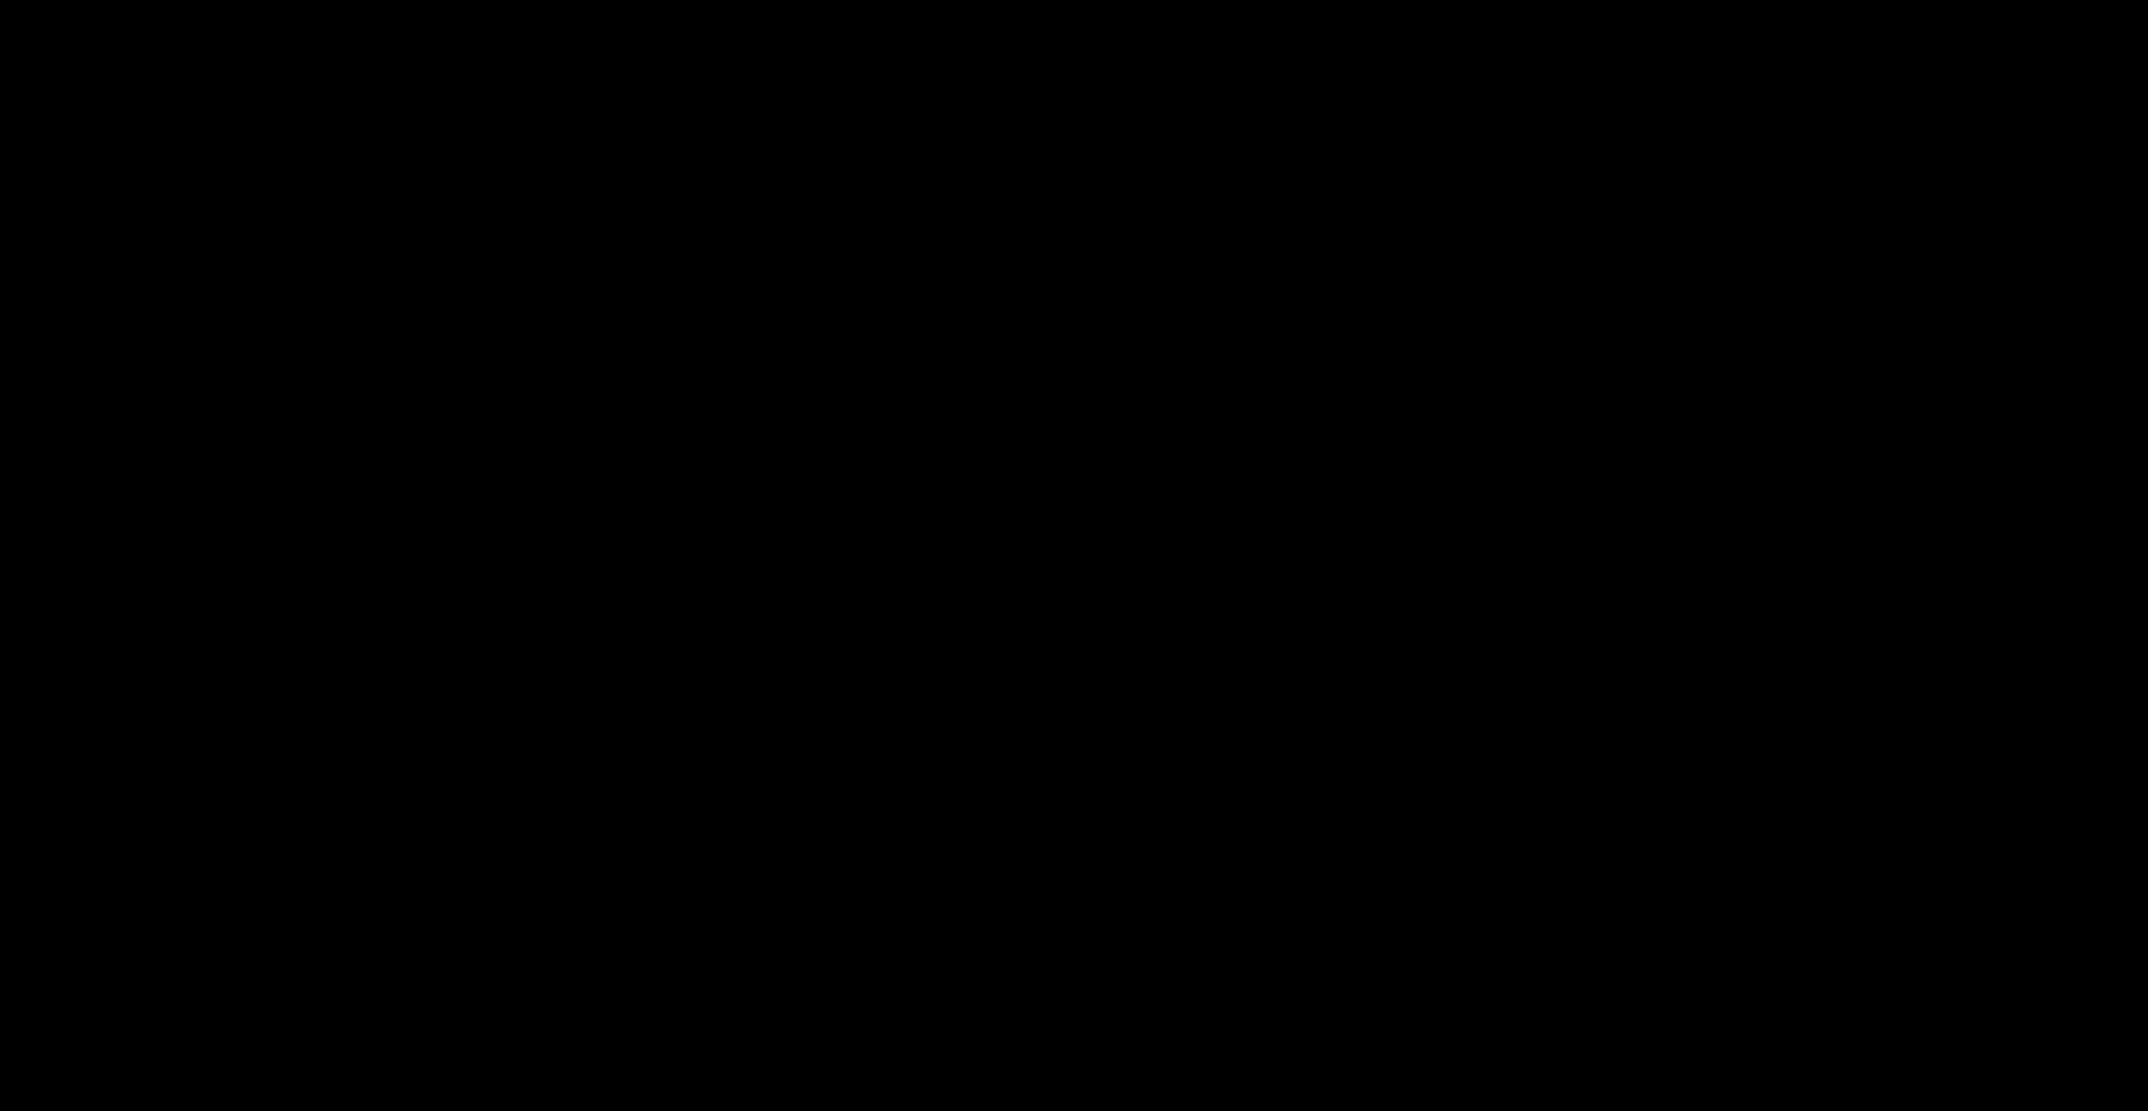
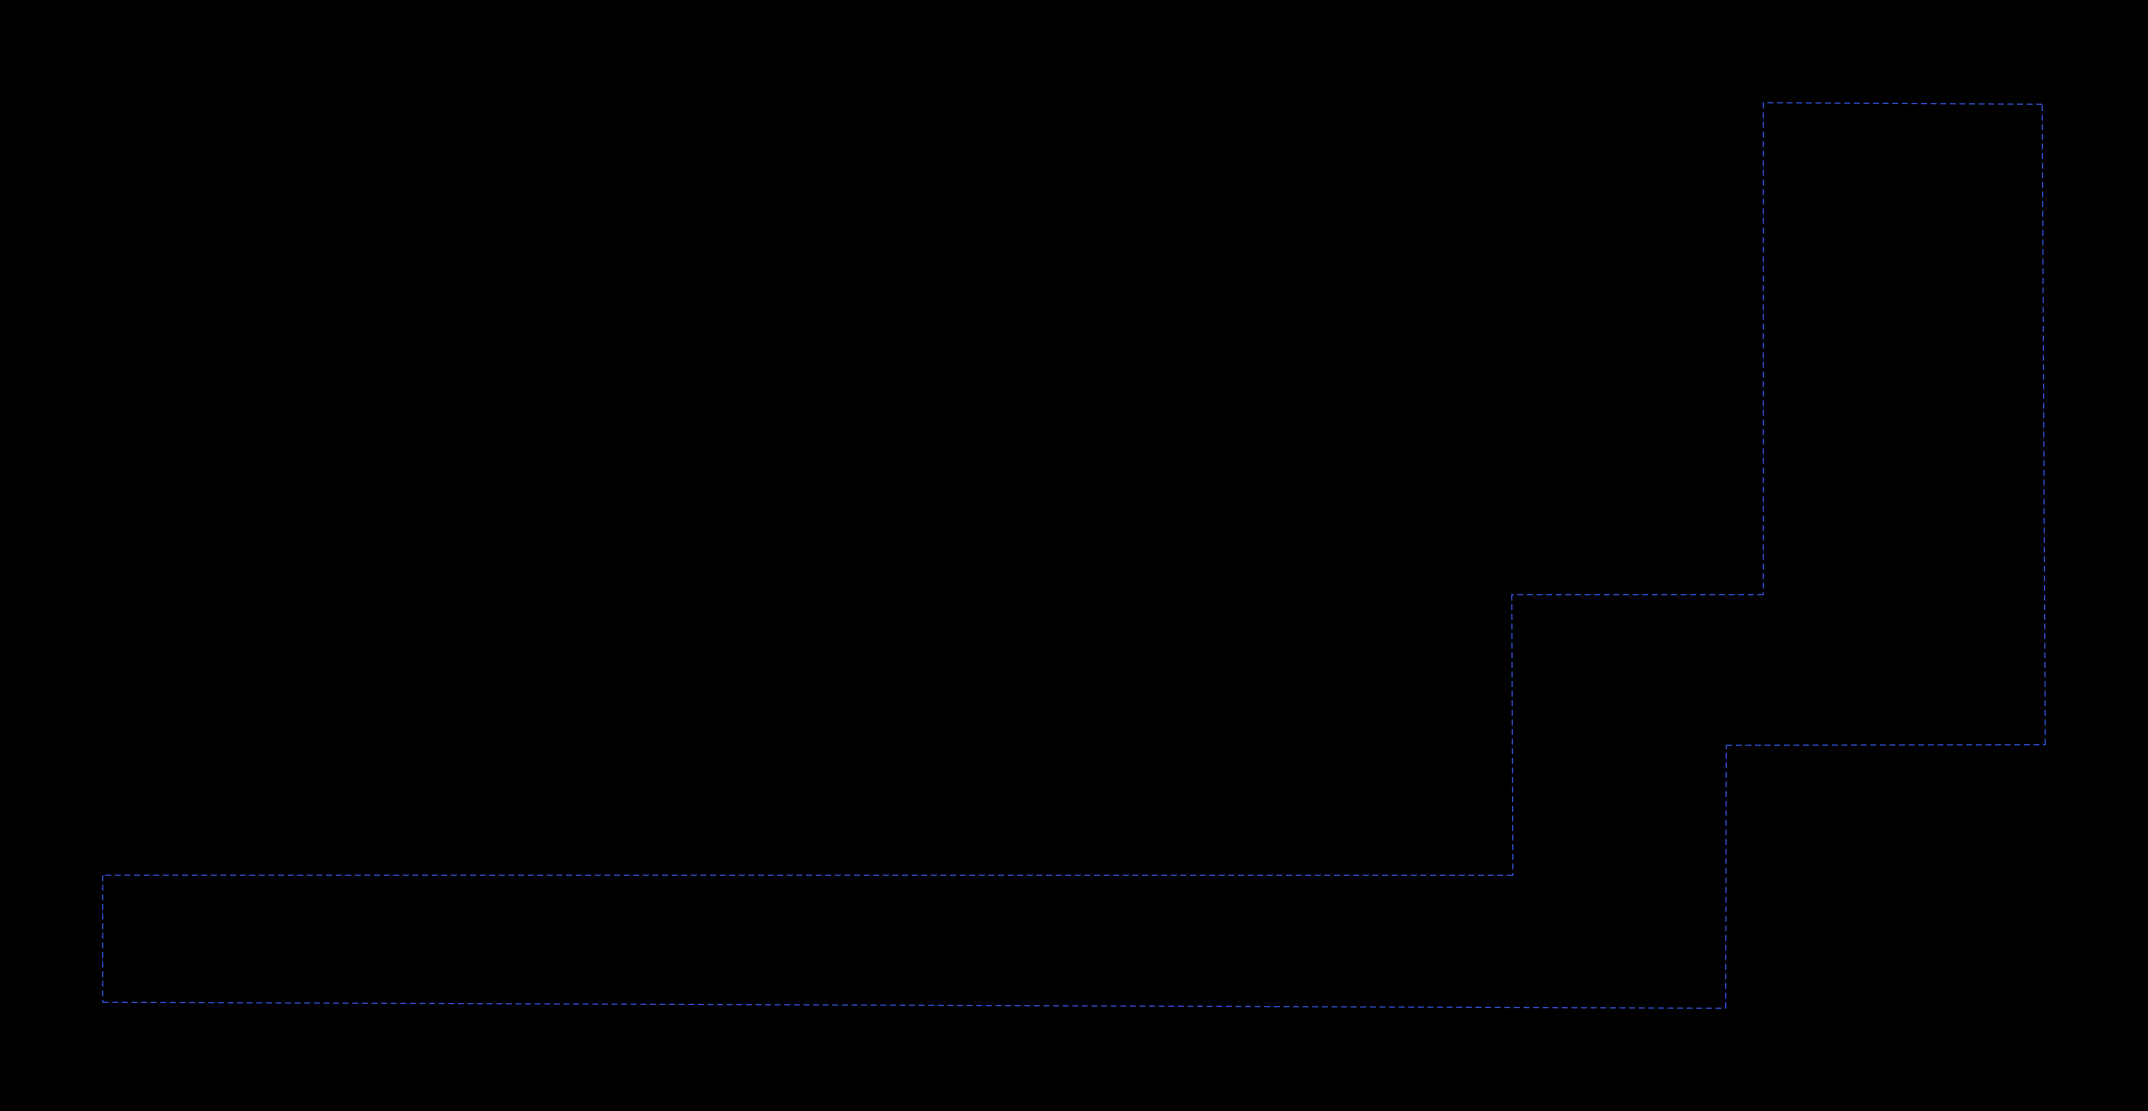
bottom zone outline: none -> (1763, 102) (2042, 104) (2045, 744) (1726, 745) (1725, 1008) (102, 1002) (102, 875) (1512, 875) (1511, 594) (1763, 594) (1763, 102)

